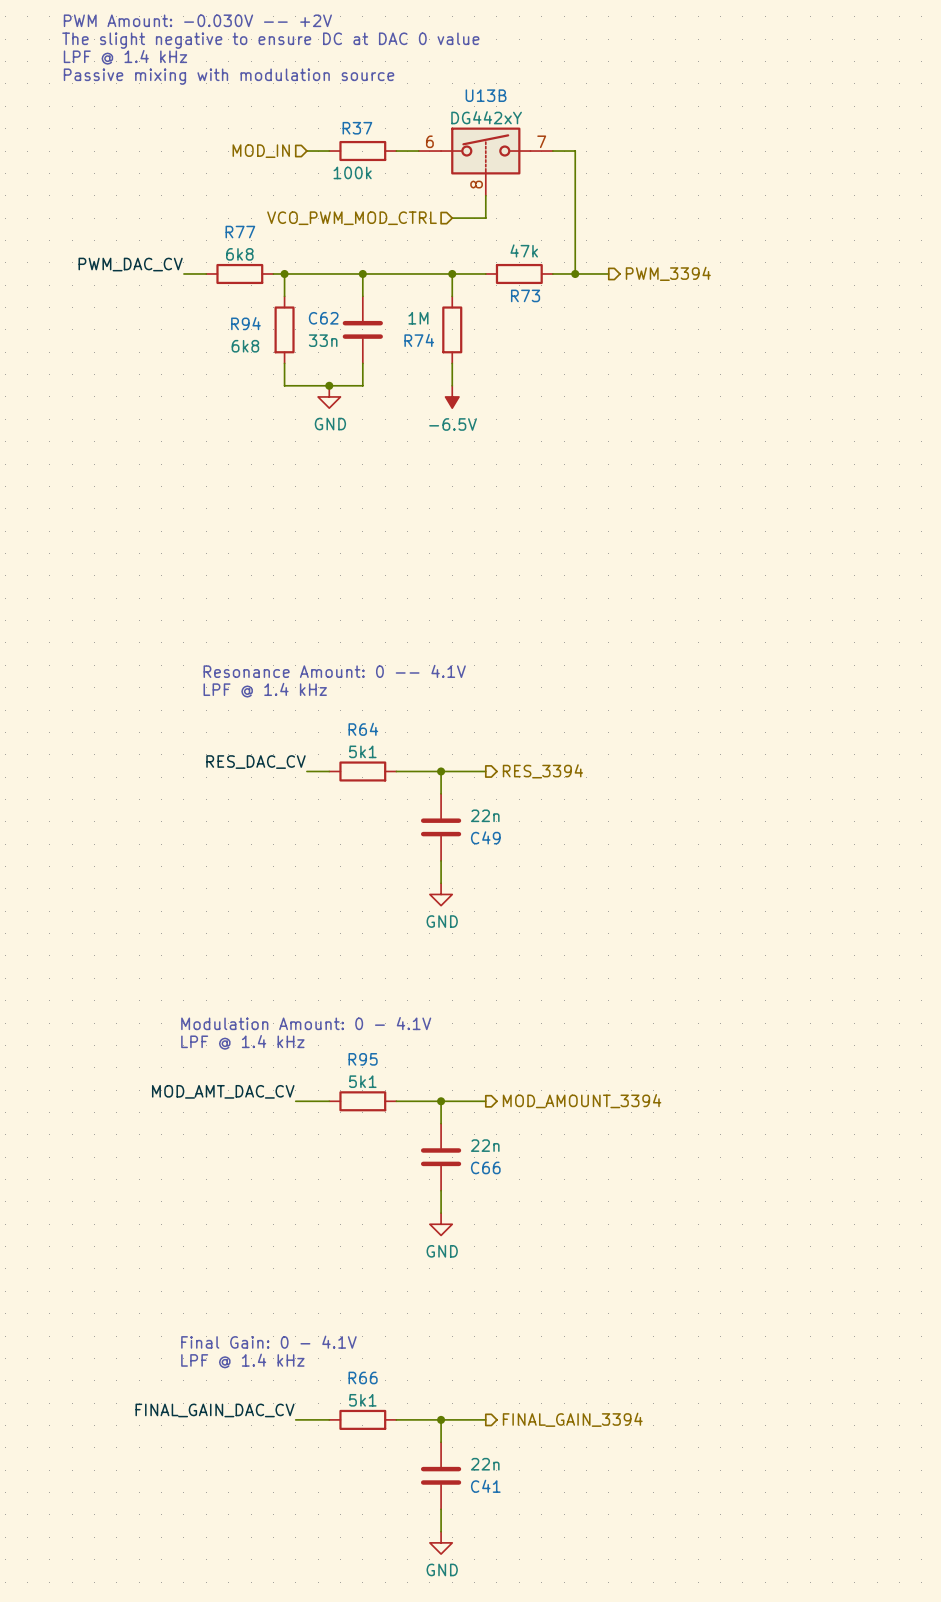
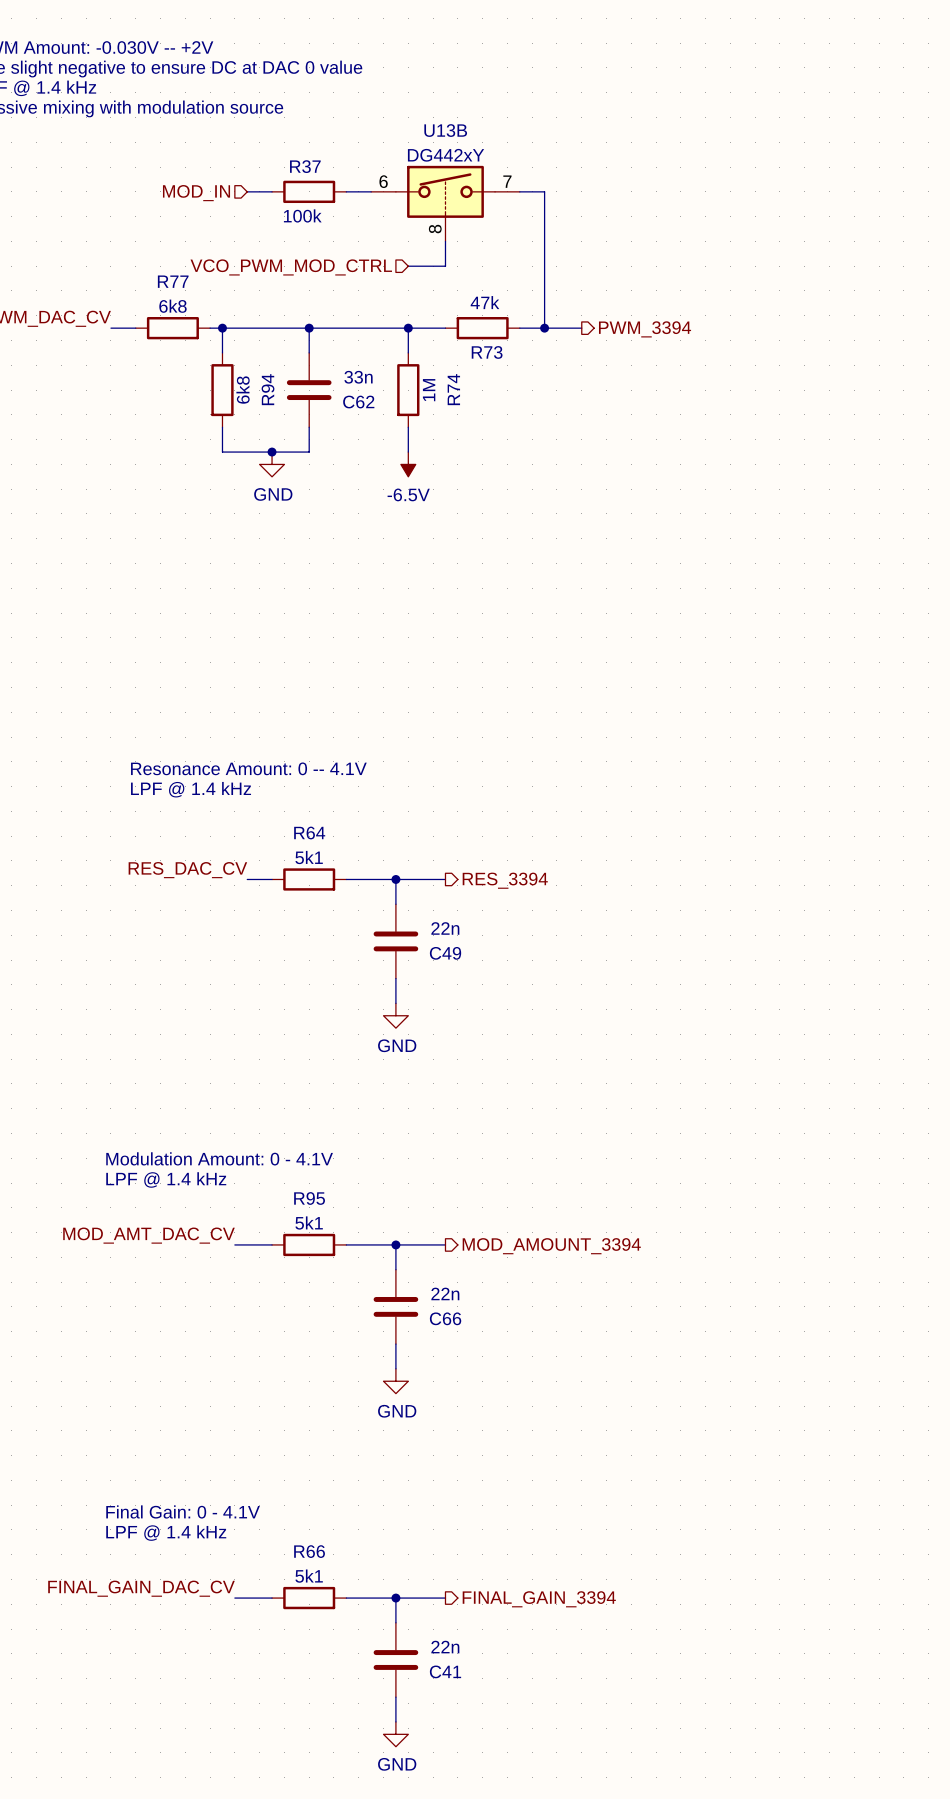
C62 name position: C62 (323, 318) -> C62 (358, 402)
R74 value rotation: 0° (418, 318) -> 90° counterclockwise (429, 390)
R74 value position: 1M (418, 318) -> 1M (429, 390)
R94 name rotation: 0° (245, 323) -> 90° counterclockwise (268, 389)
R94 name position: R94 (245, 323) -> R94 (268, 389)
C62 value position: 33n (323, 340) -> 33n (358, 377)
R74 name rotation: 0° (419, 340) -> 90° counterclockwise (453, 389)
R74 name position: R74 (419, 340) -> R74 (453, 389)
R94 value rotation: 0° (245, 346) -> 90° counterclockwise (243, 390)
R94 value position: 6k8 (245, 346) -> 6k8 (243, 390)

